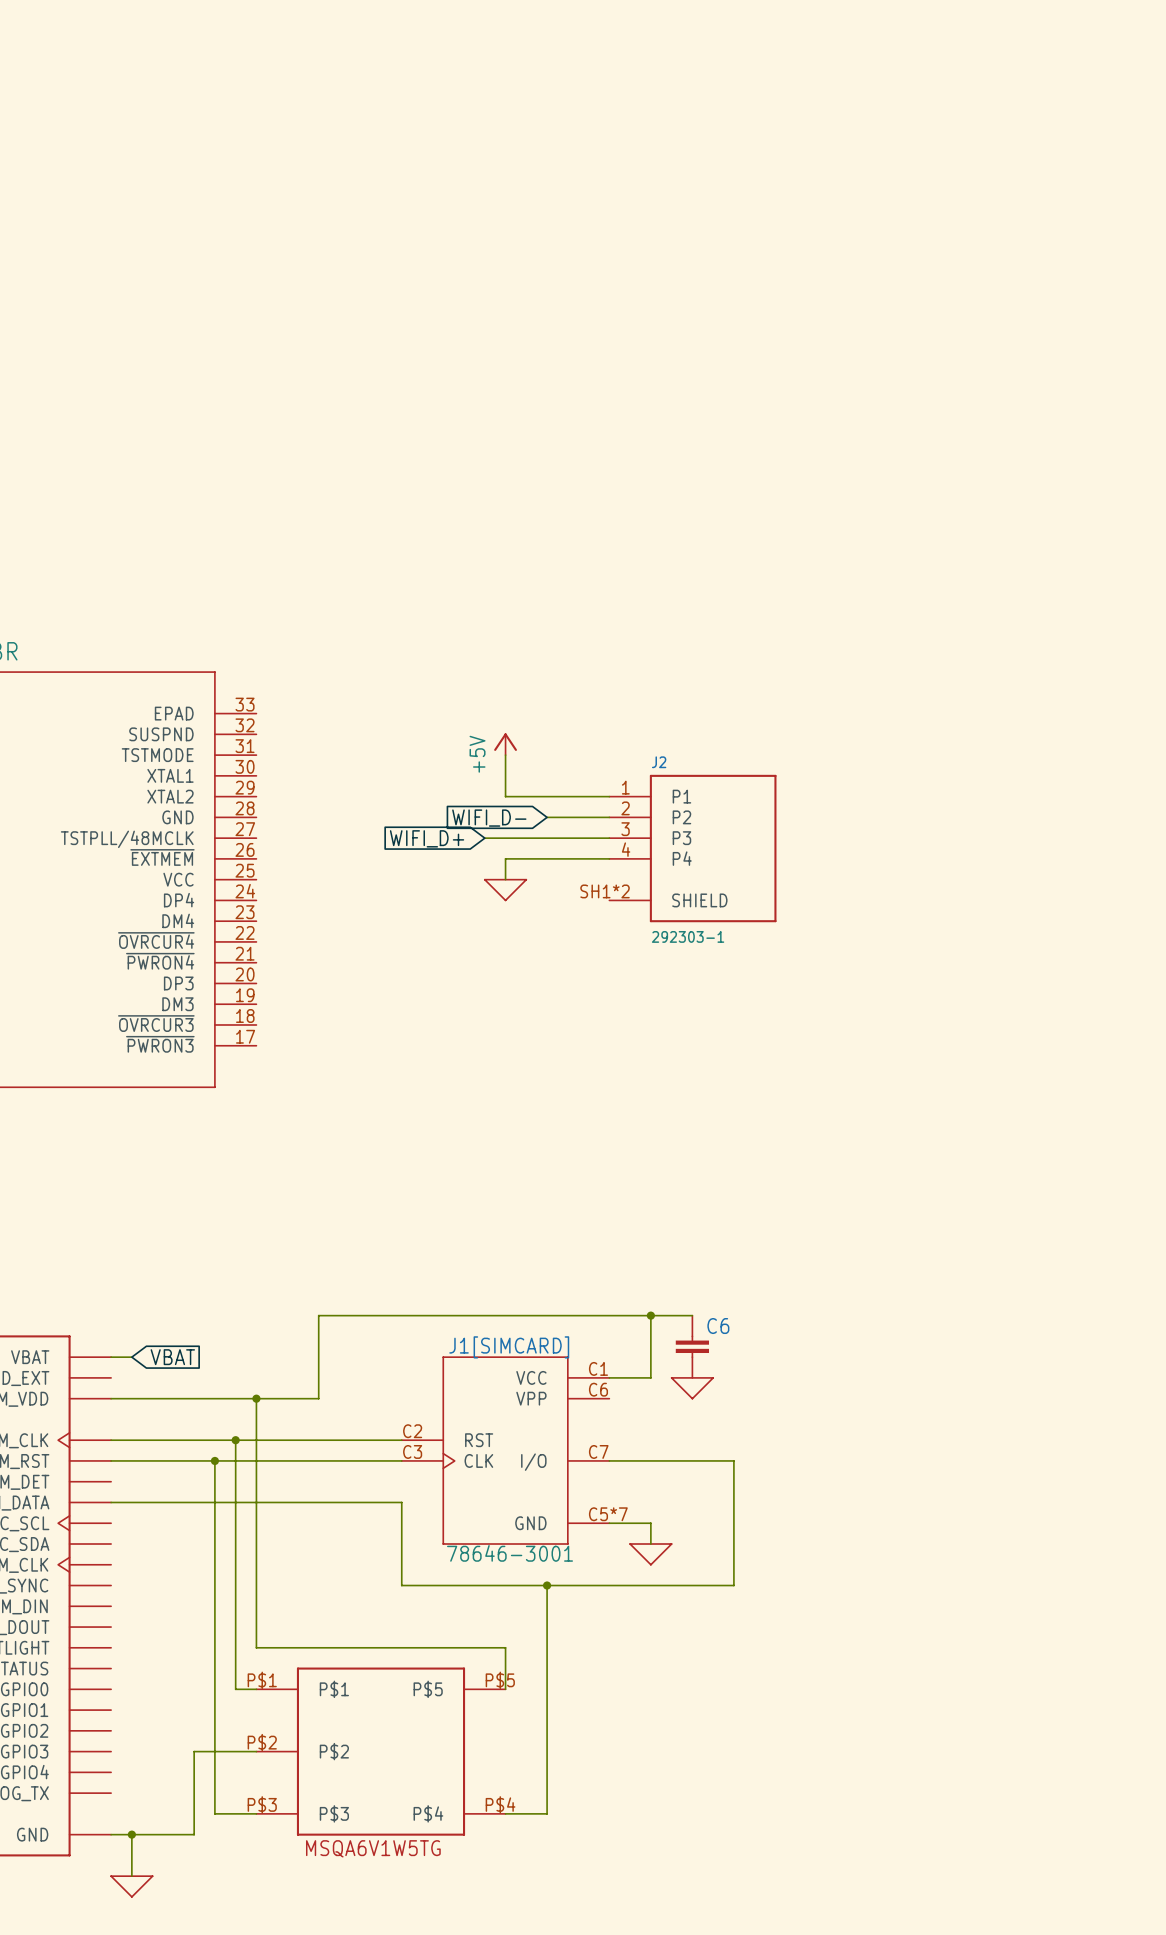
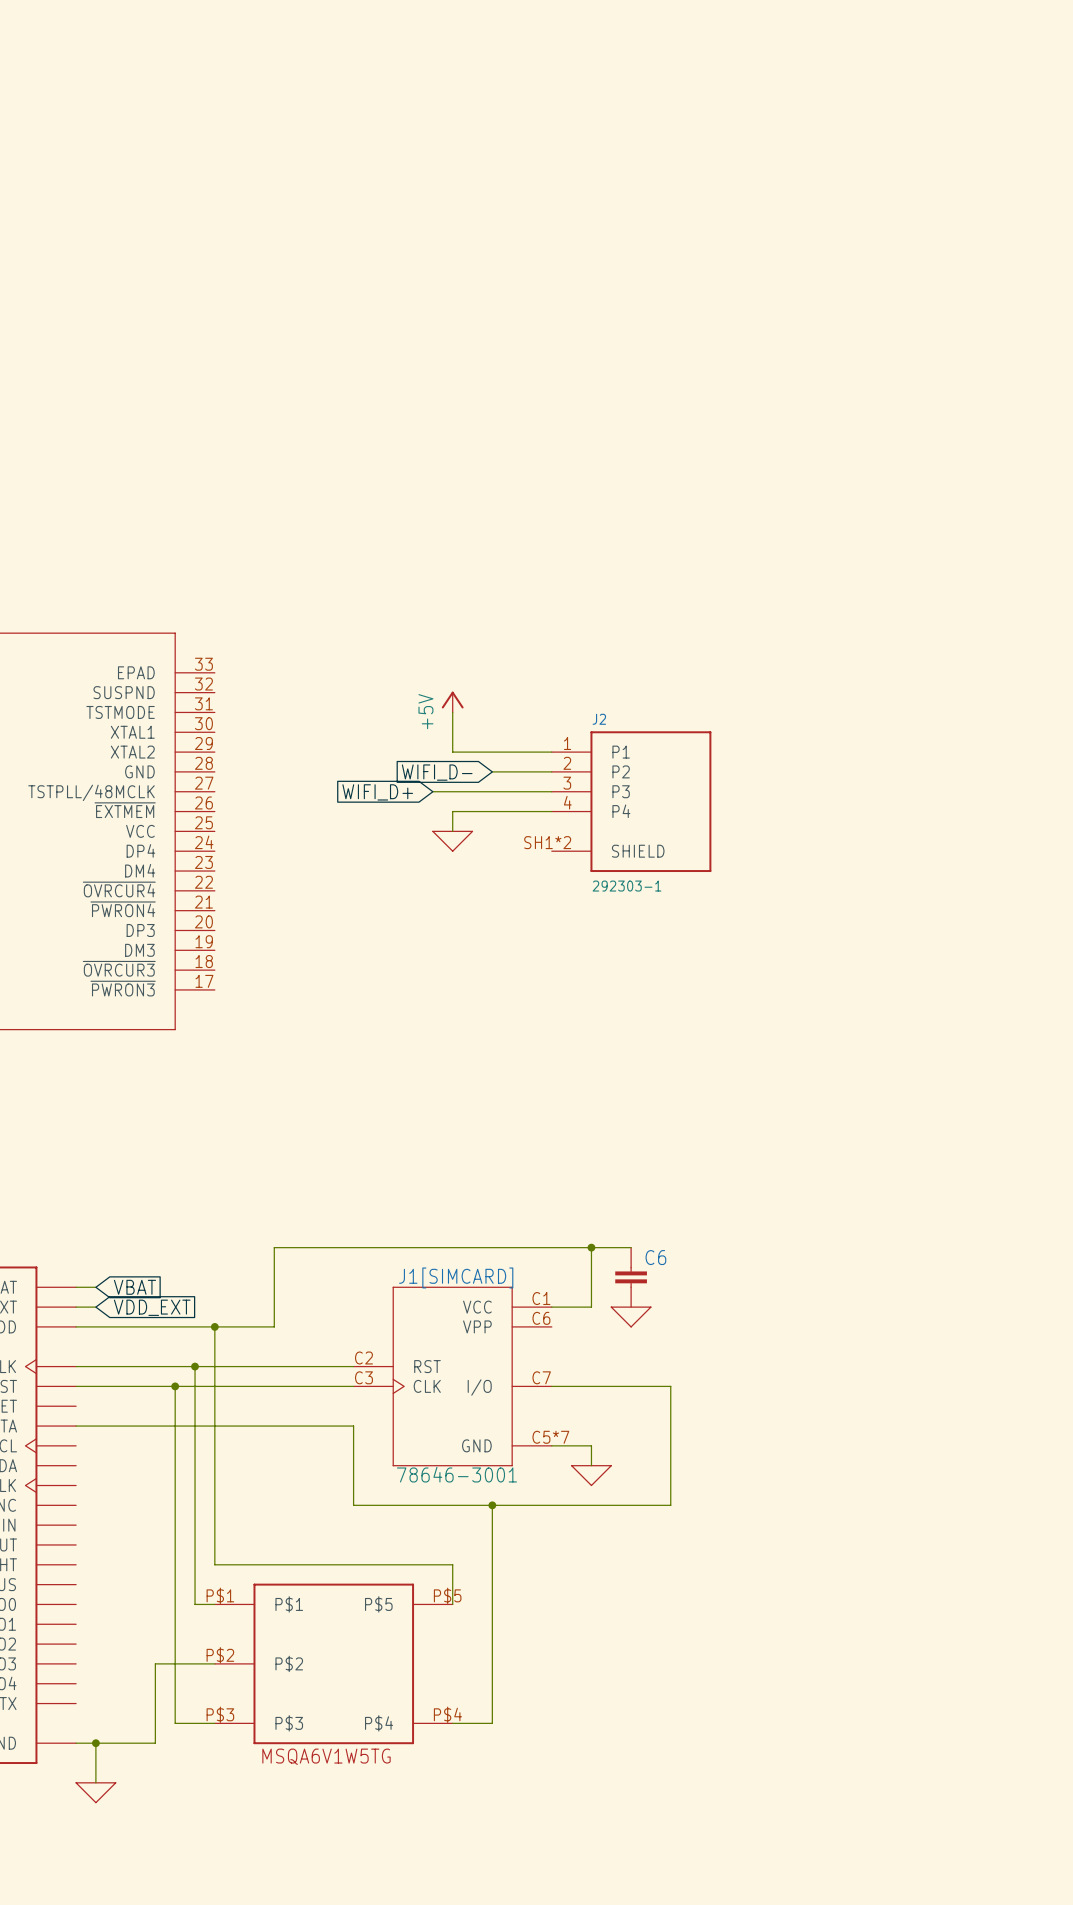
wire: none -> (76, 1307) (95, 1307)
global label: none -> VDD_EXT (152, 1307)

